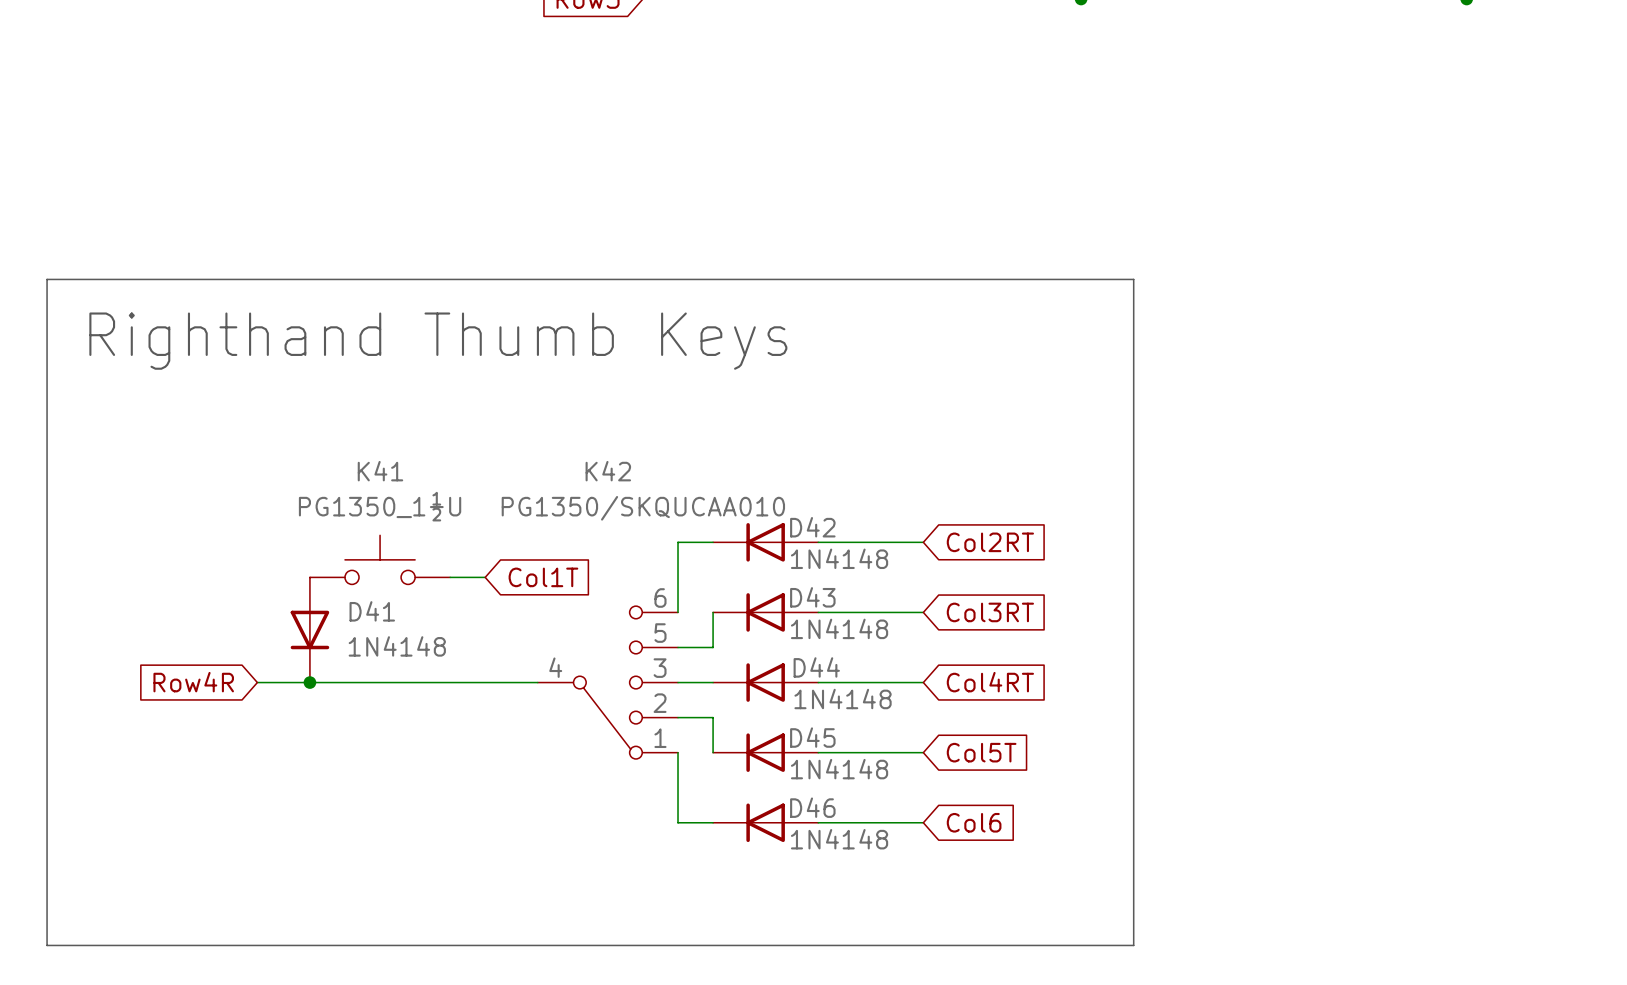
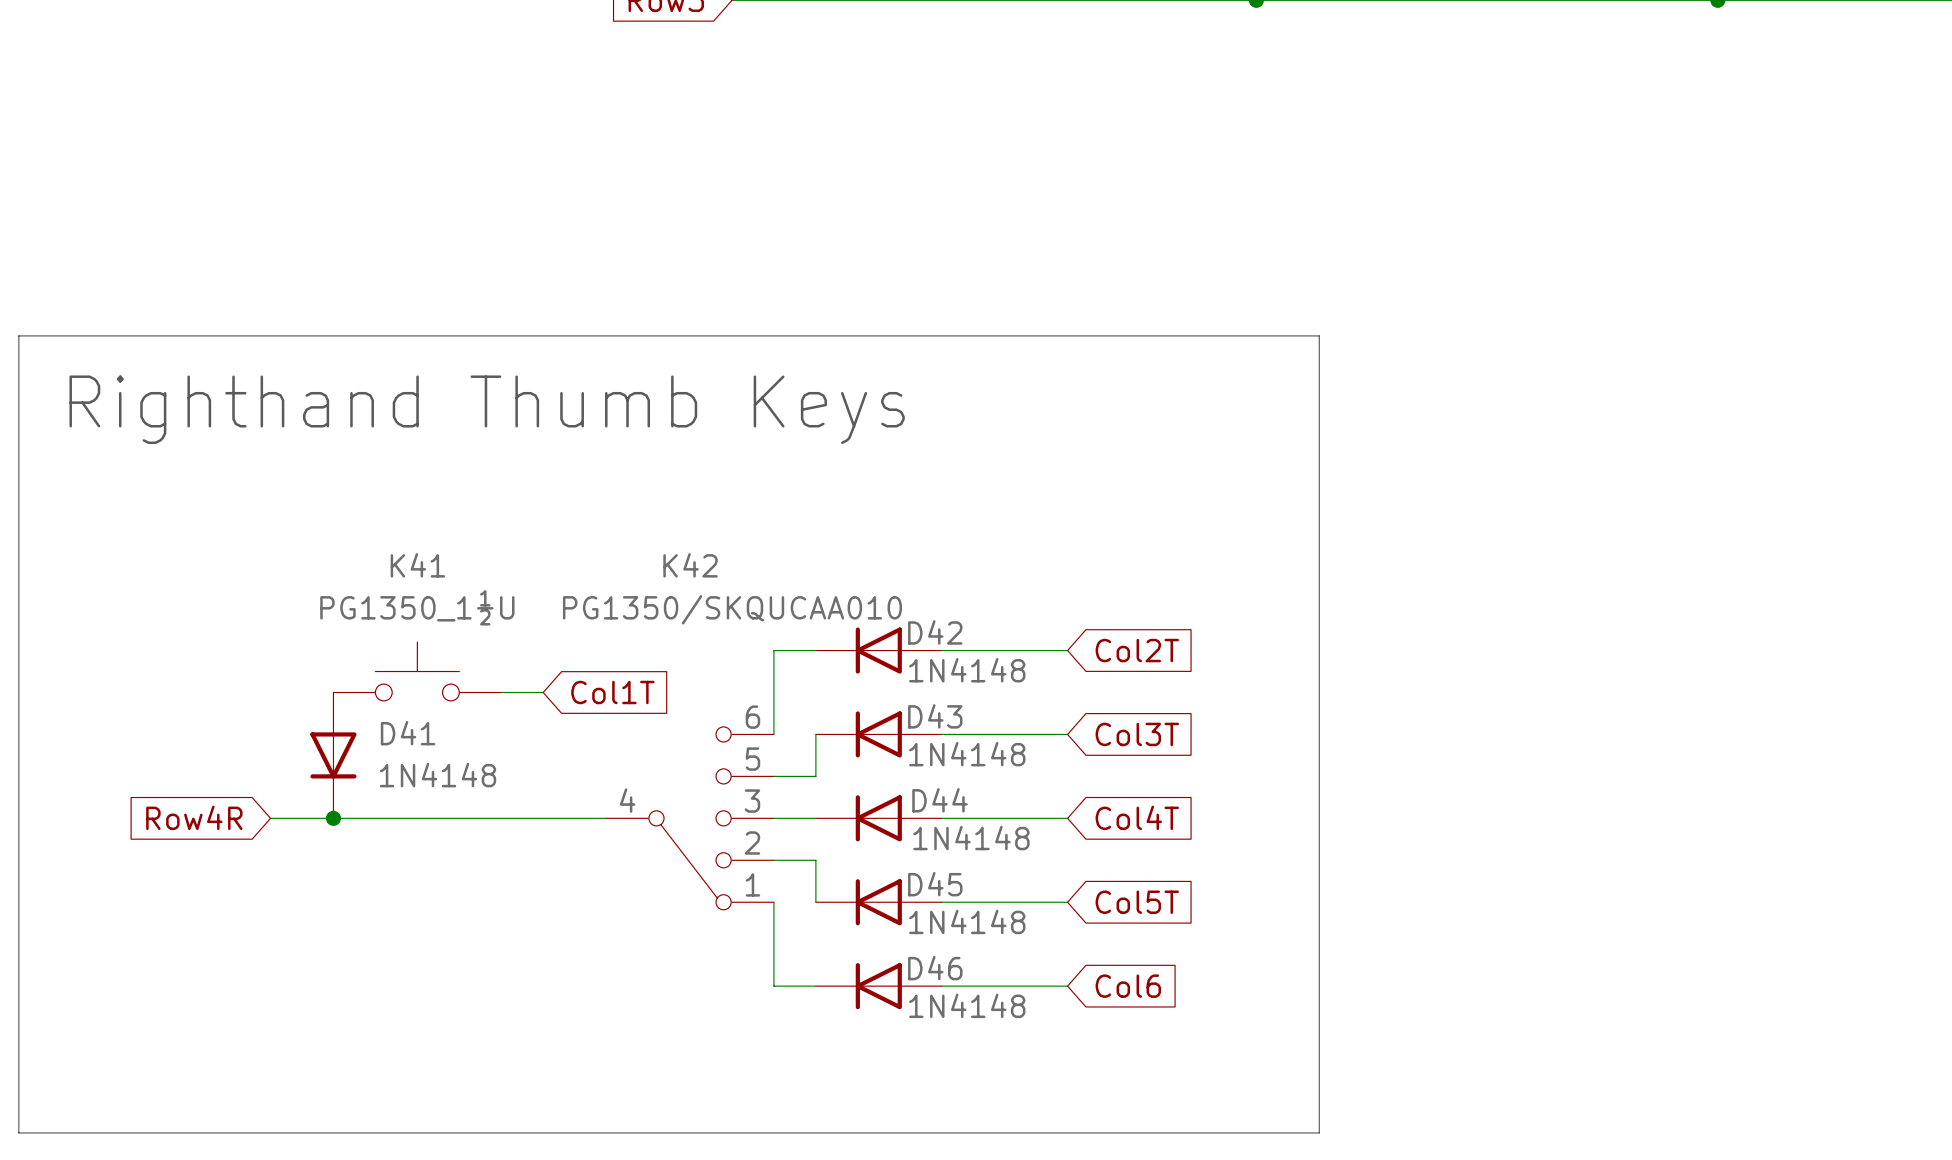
global label: Col2RT (990, 542) -> Col2T (1137, 650)
global label: Col3RT (990, 612) -> Col3T (1137, 734)
global label: Col4RT (990, 682) -> Col4T (1137, 817)

